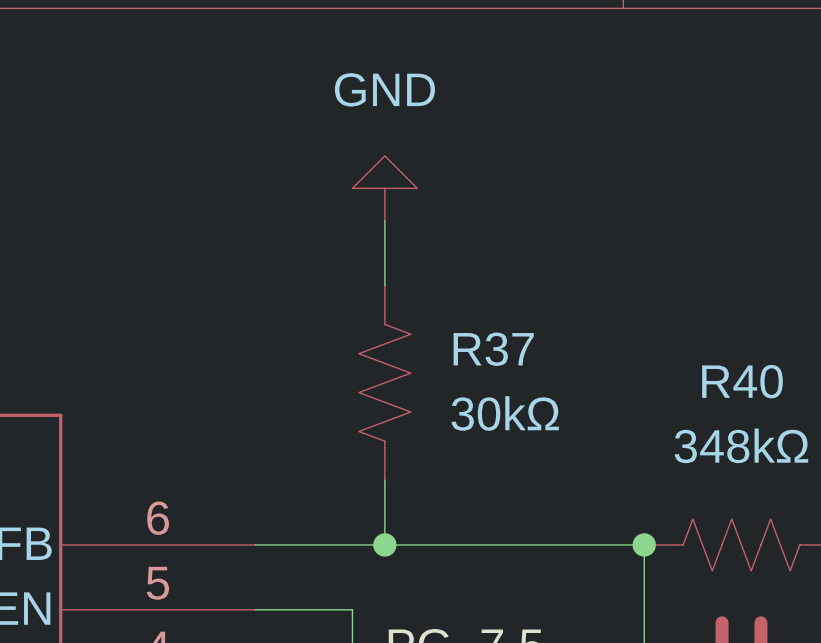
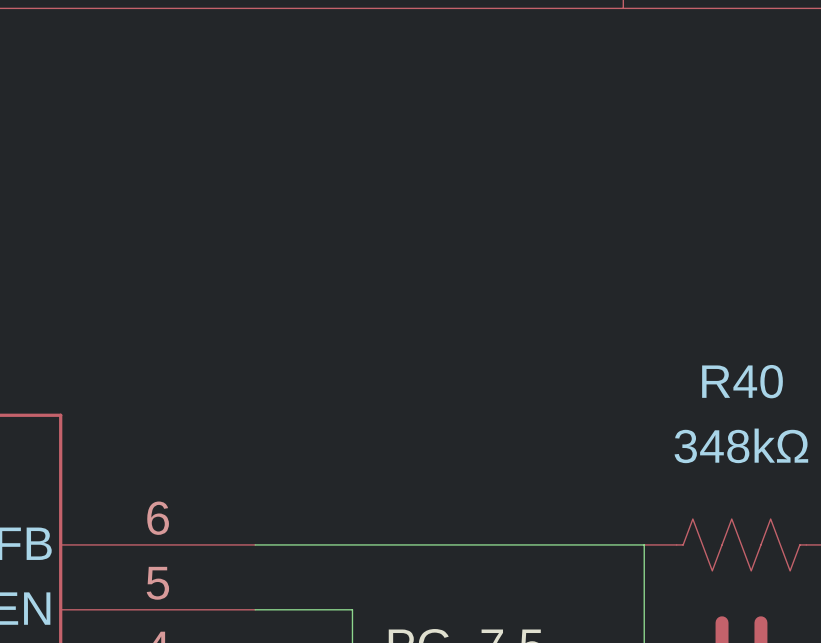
power symbol: GND (384, 188) -> none
wire: (384, 220) (384, 285) -> none
R37: 30kΩ (384, 382) -> none
wire: (384, 480) (384, 544) -> none
junction: (384, 544) -> none
junction: (644, 544) -> none

